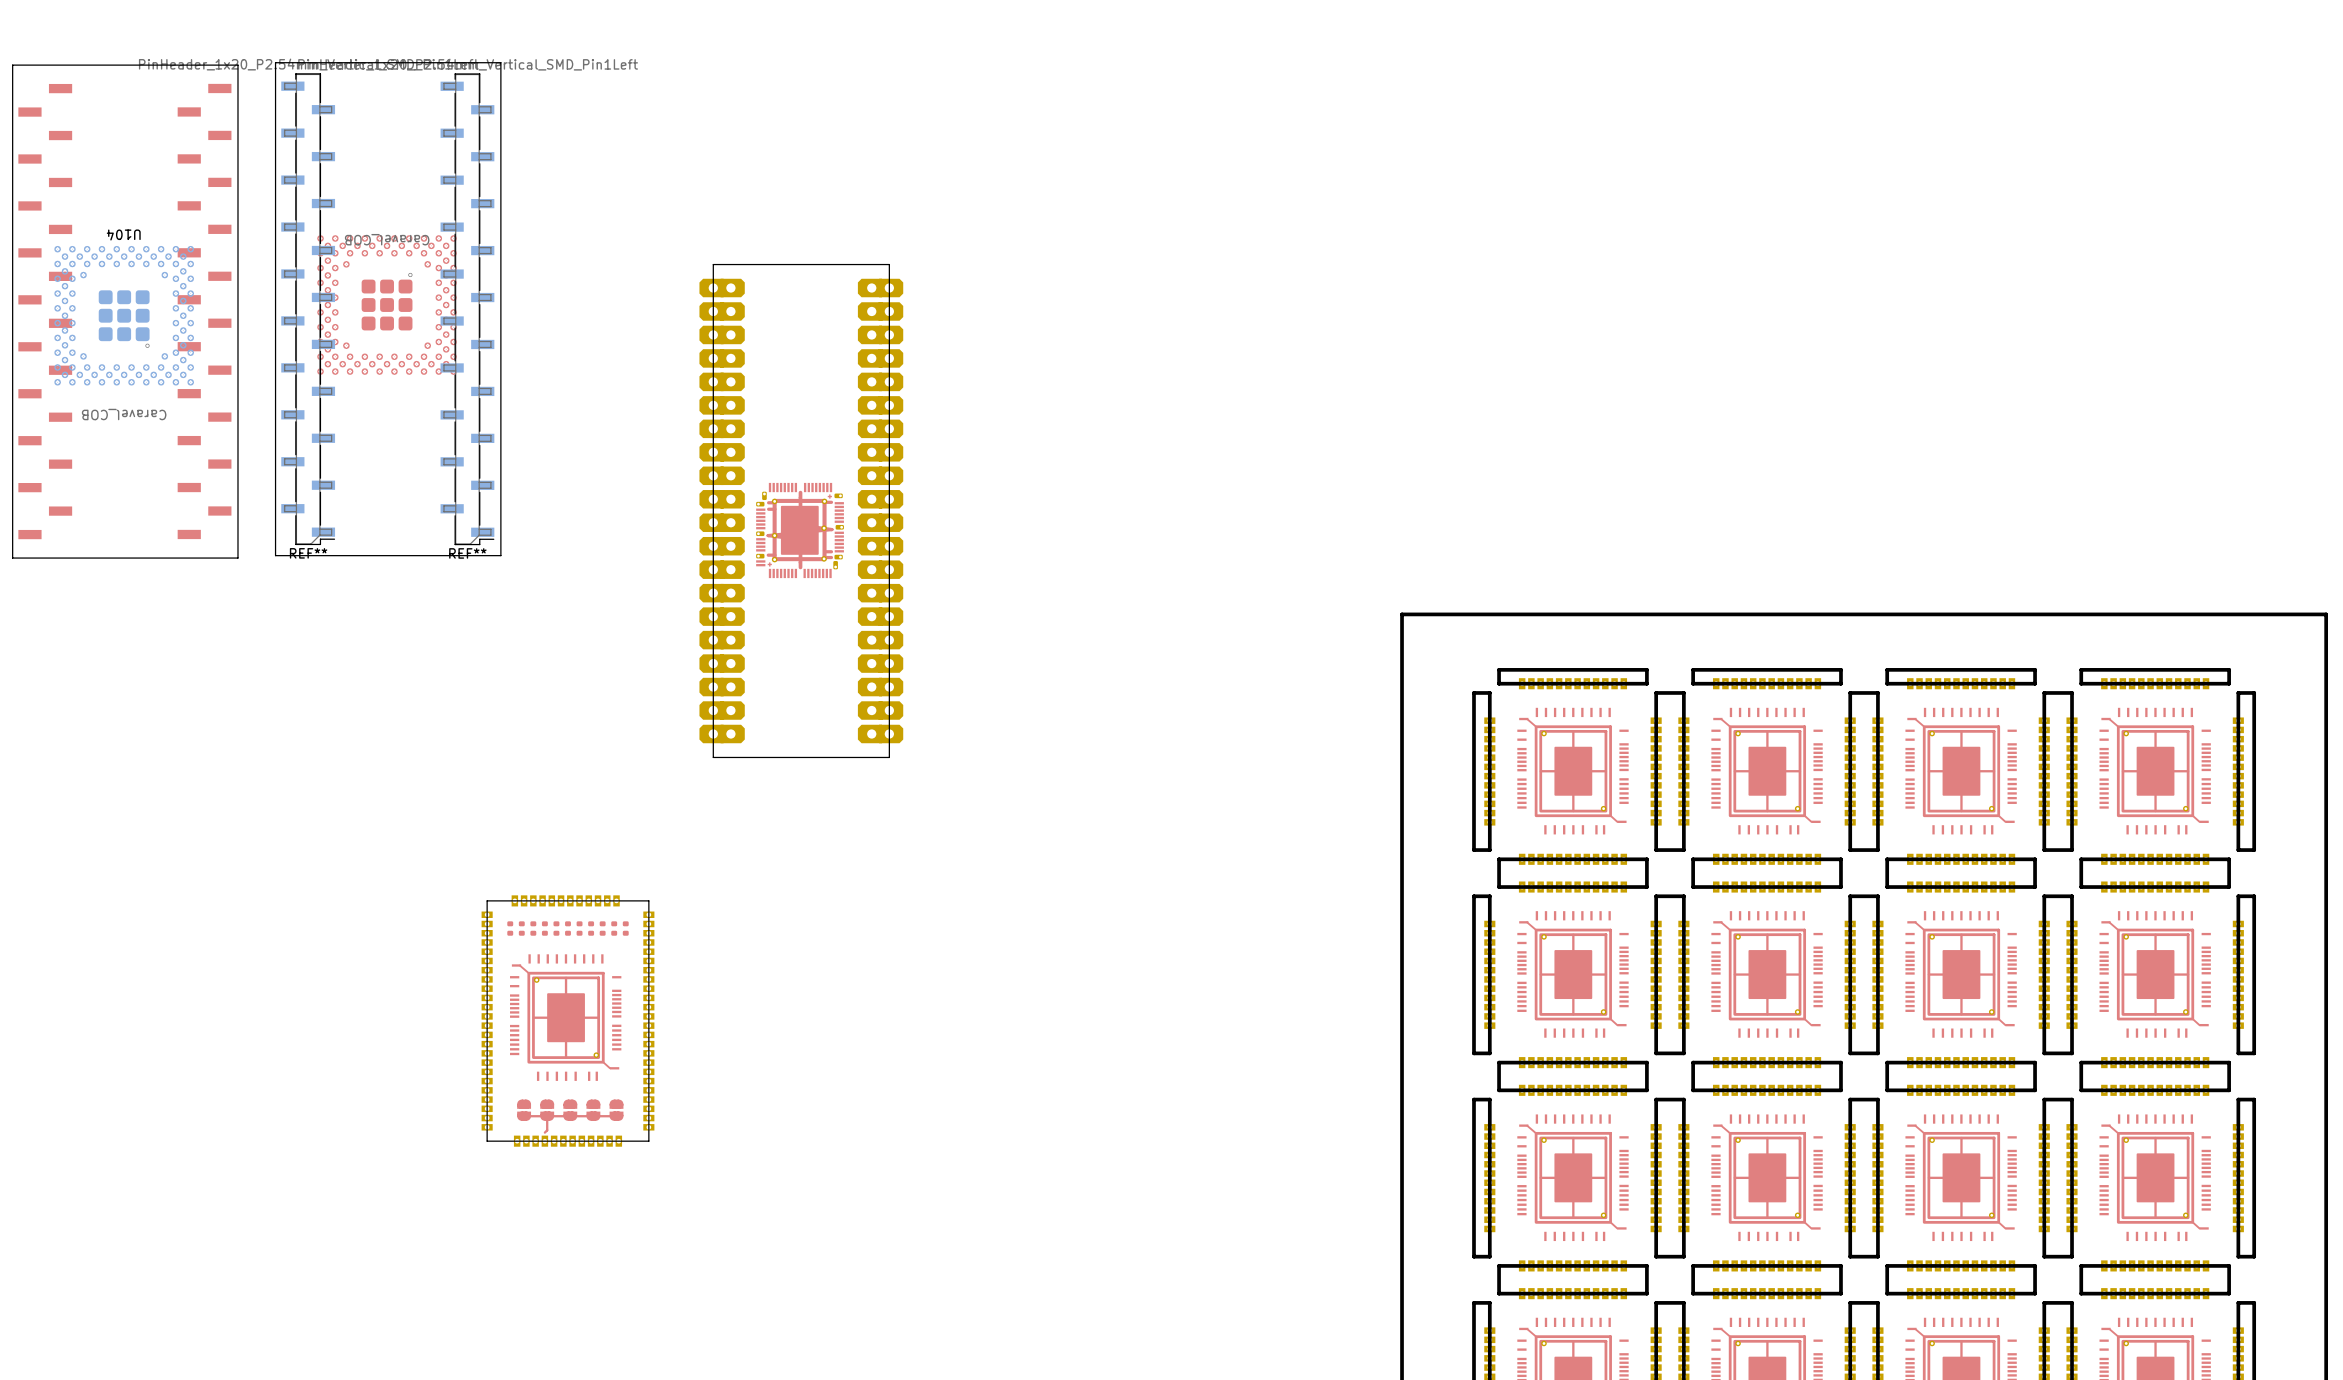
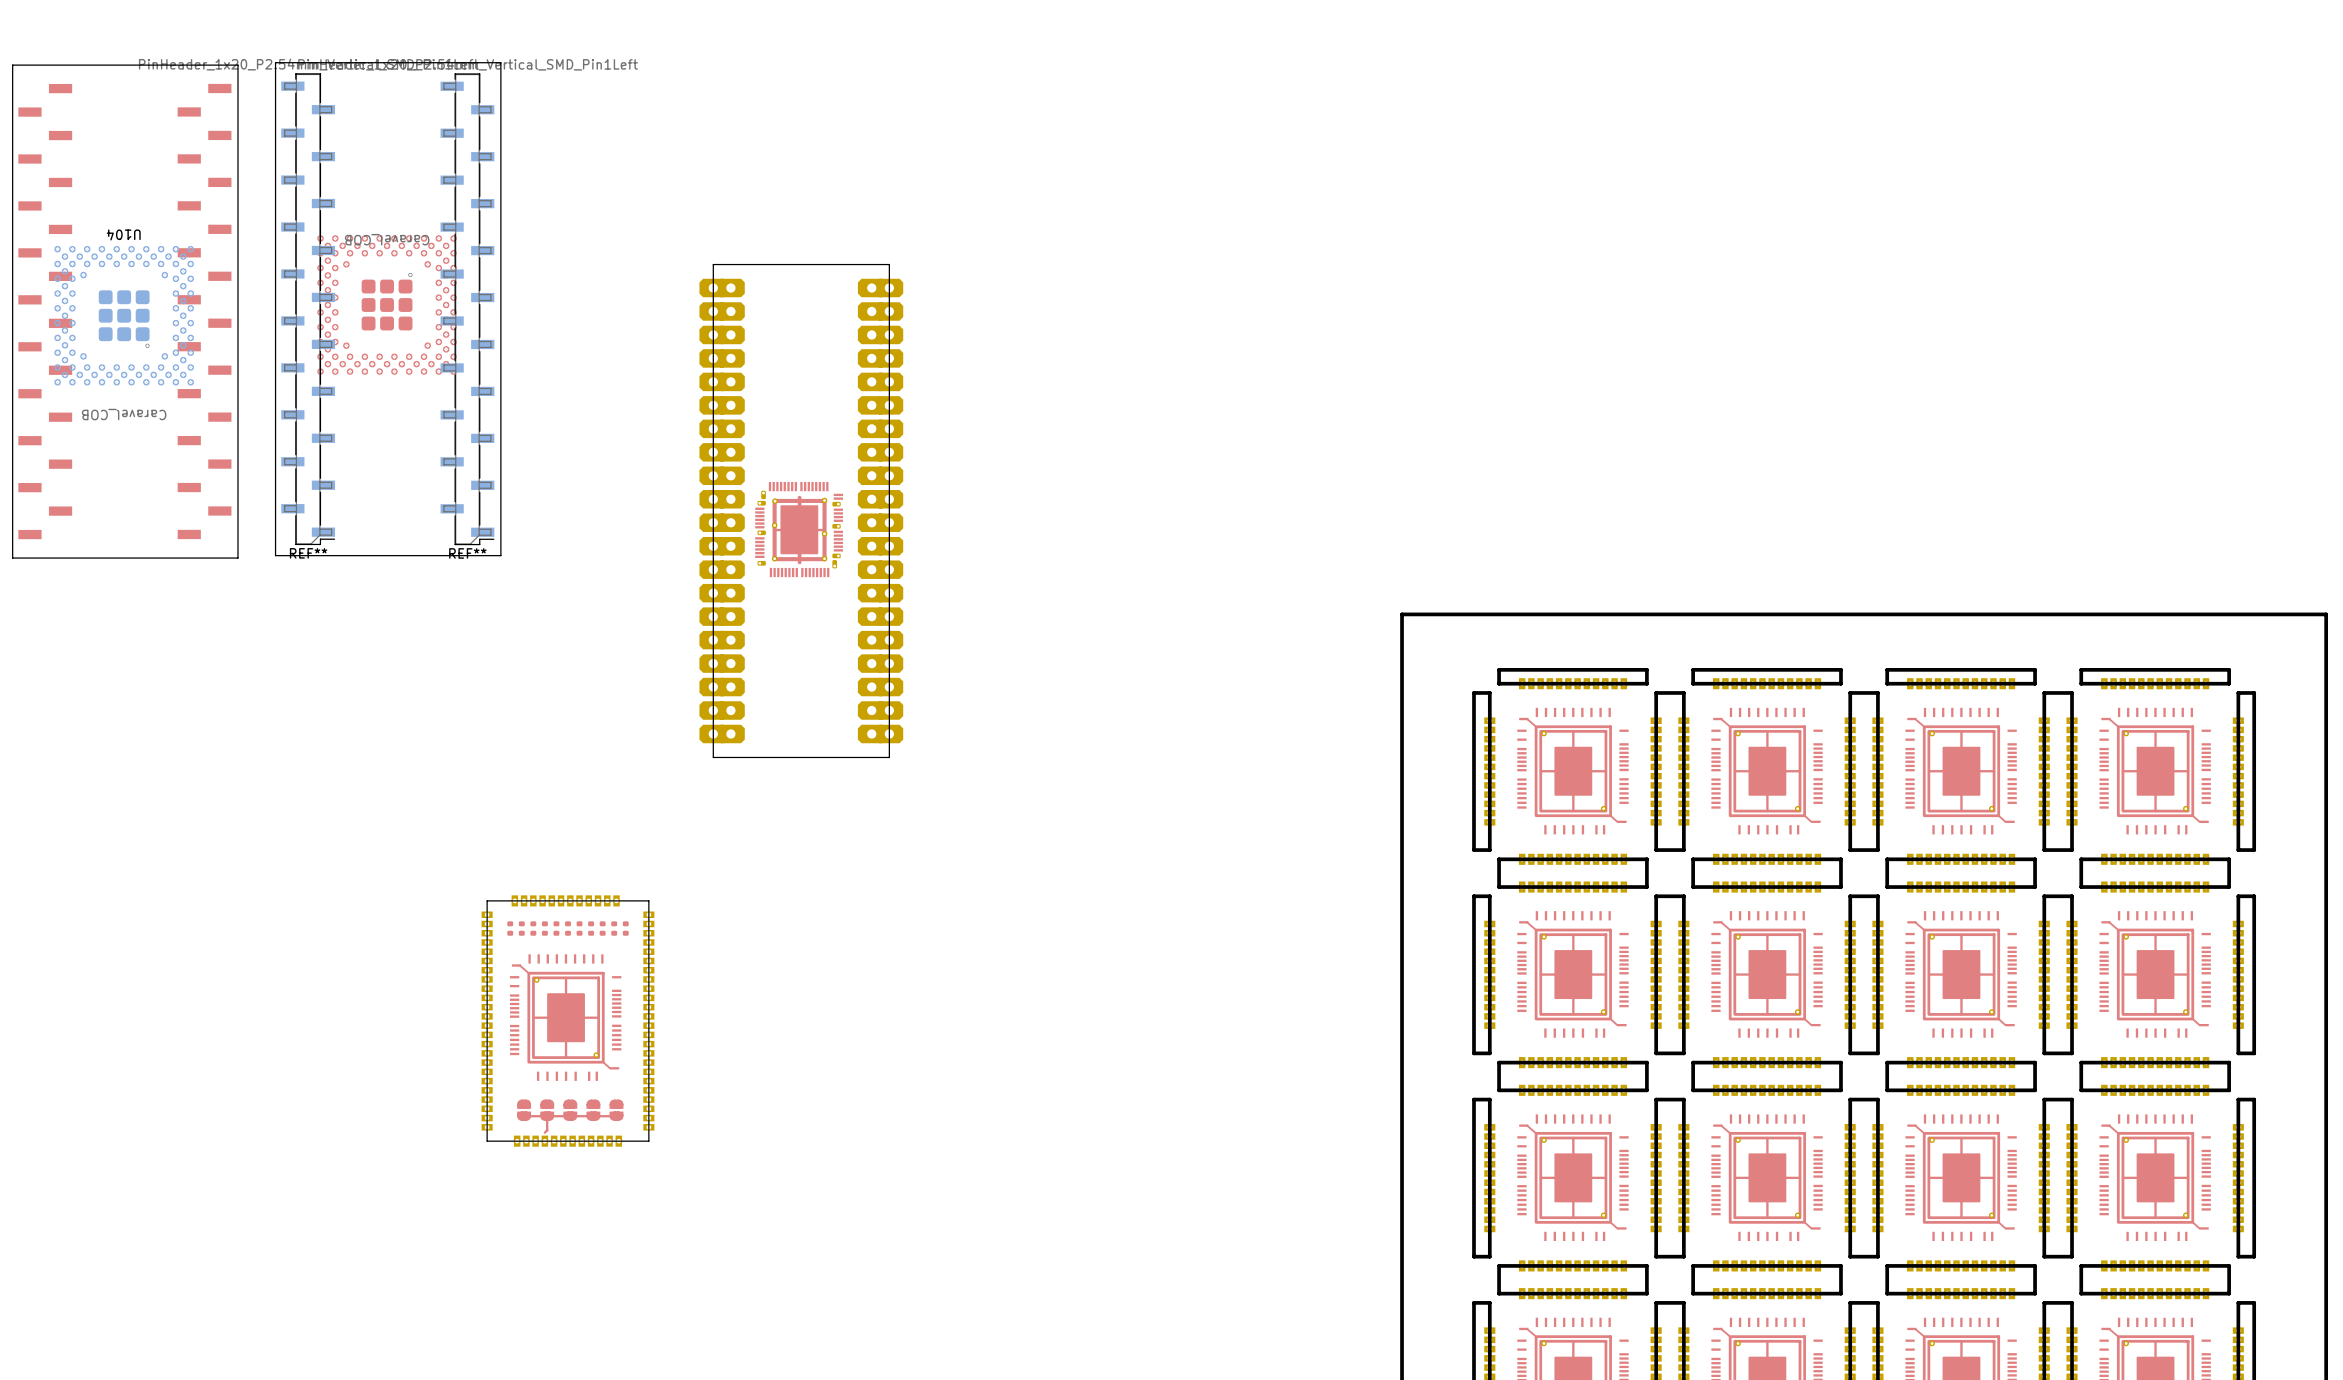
part footprint: [756, 482, 844, 579] -> [755, 481, 844, 578]

